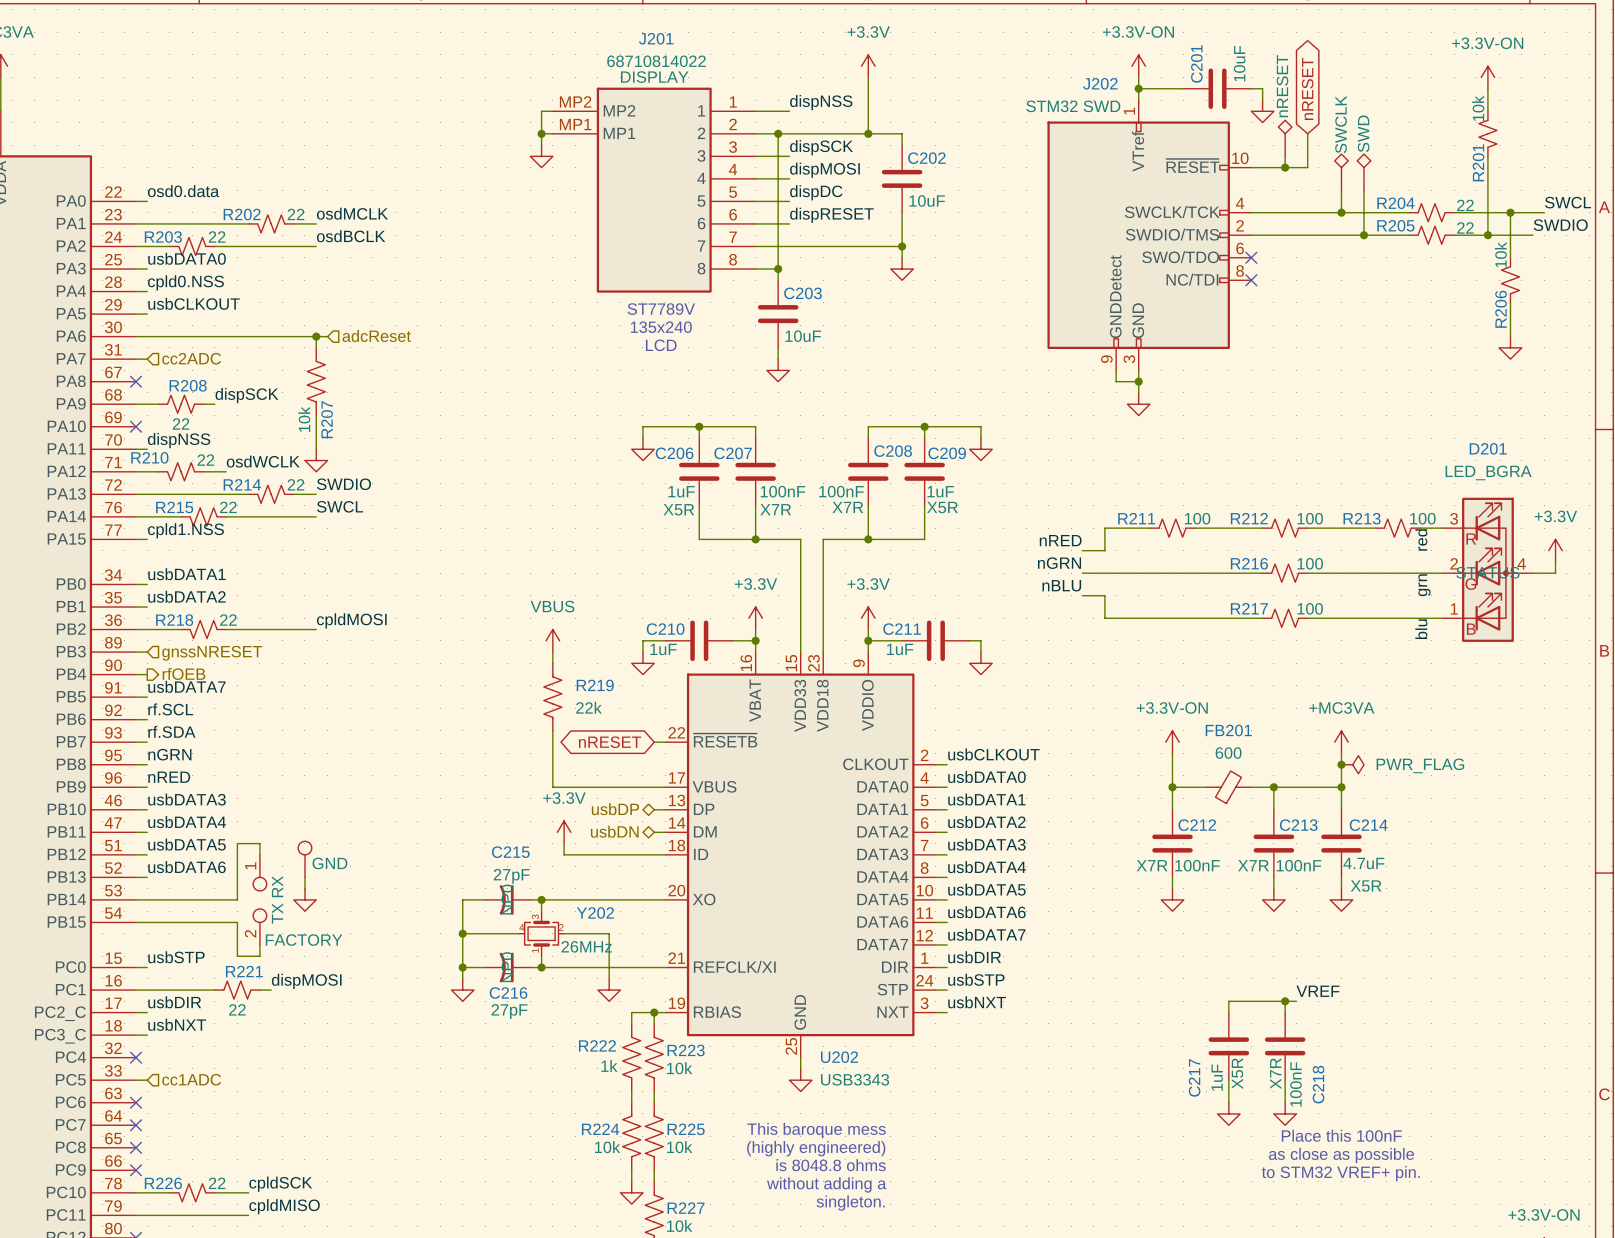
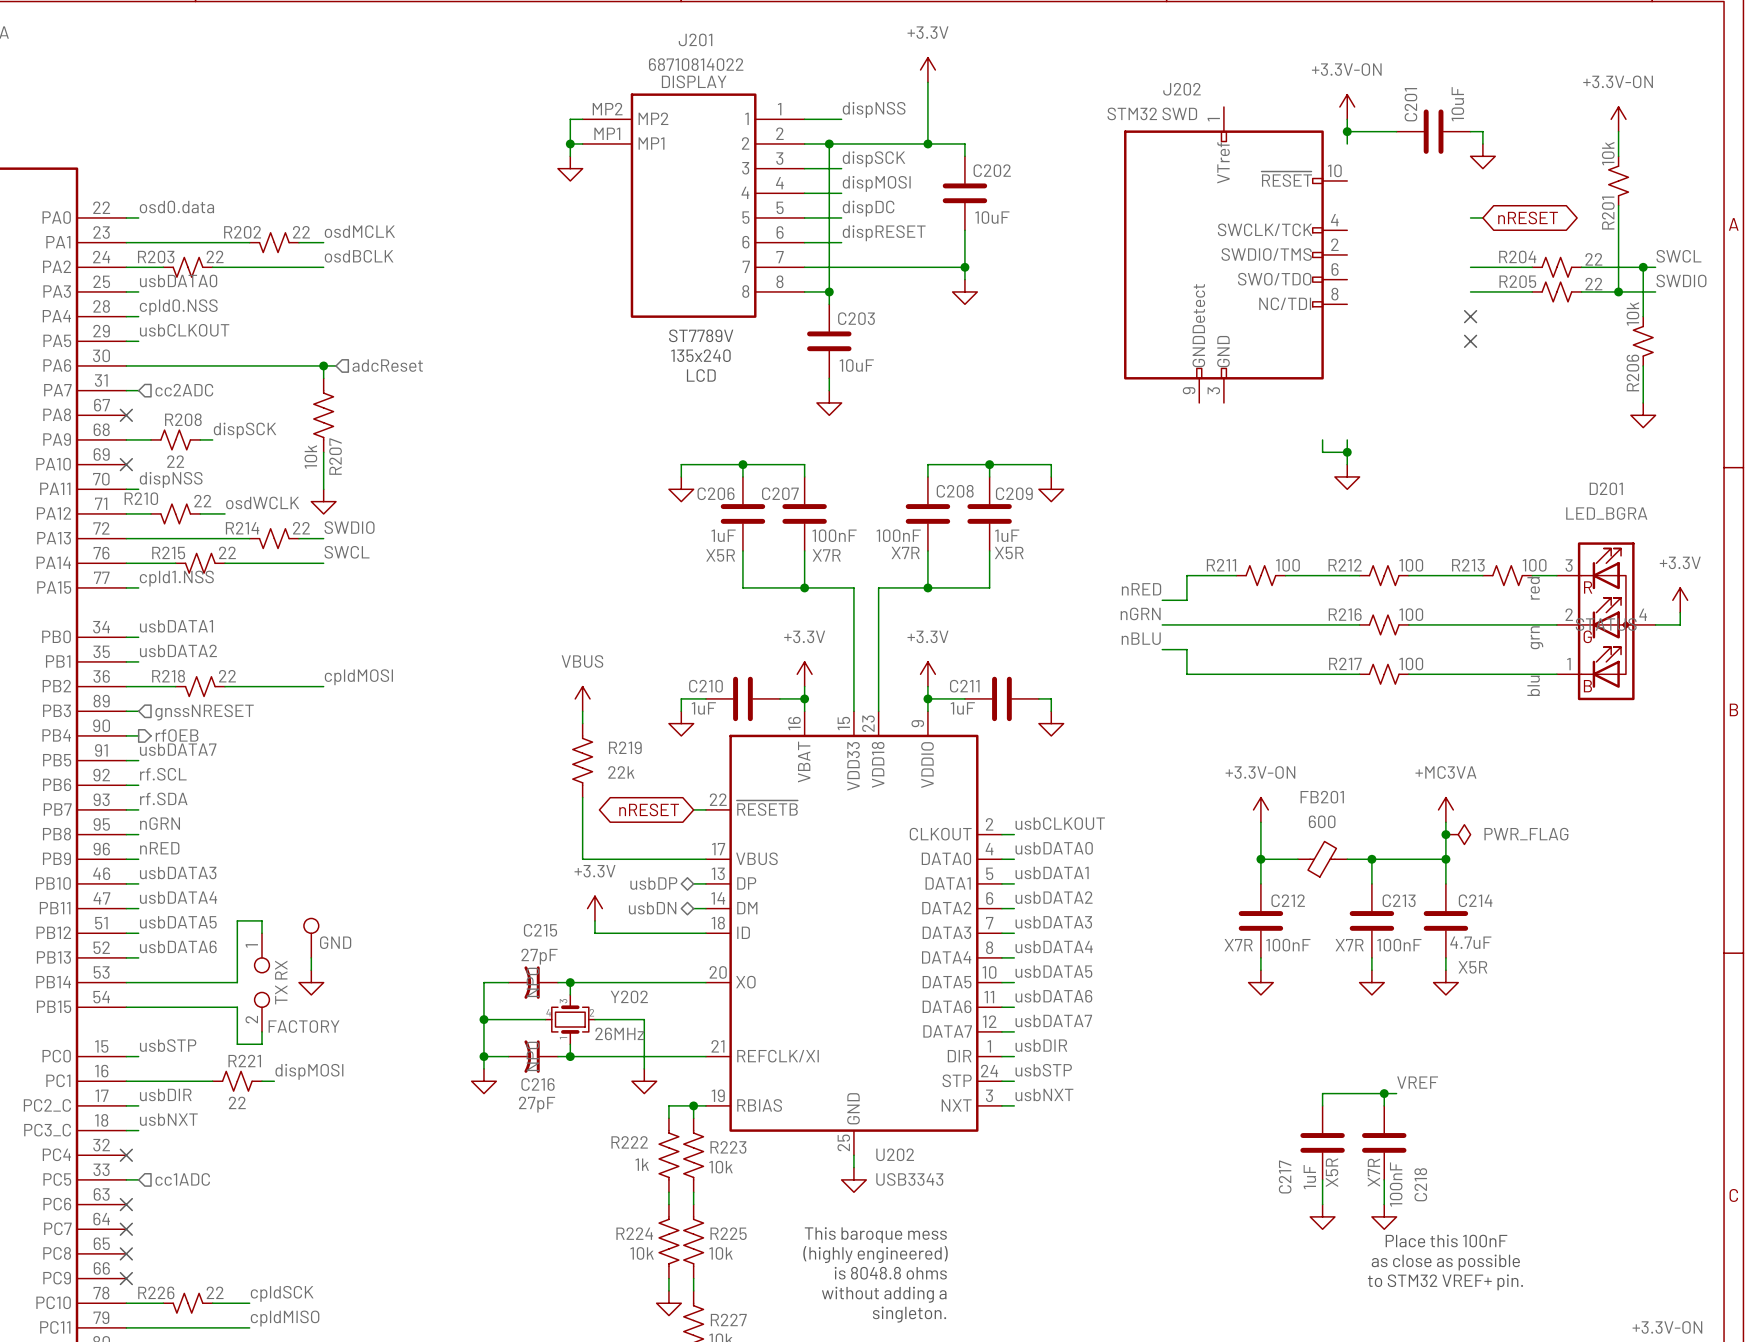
power symbol position: +3.3V-ON (1138, 66) -> +3.3V-ON (1347, 106)
wire: (1138, 77) (1138, 100) -> (1347, 119) (1347, 143)
power symbol position: +3.3V-ON (1487, 77) -> +3.3V-ON (1618, 119)
wire: (1138, 88) (1183, 88) -> (1347, 131) (1396, 131)
junction: (1138, 88) -> none
C201 position: (1217, 88) -> (1433, 131)
wire: (1251, 88) (1262, 88) (1262, 100) -> (1470, 131) (1482, 131) (1482, 143)
global label rotation: 0° (1307, 88) -> 90° clockwise (1528, 217)
global label position: nRESET (1307, 88) -> nRESET (1528, 217)
wire: (1487, 88) (1487, 111) -> (1618, 131) (1618, 156)
power symbol position: (1262, 111) -> (1482, 156)
junction: none -> (1347, 131)
wire: (1307, 133) (1307, 167) (1251, 167) -> none
R201 position: (1487, 133) -> (1618, 180)
part: (1285, 138) -> none
wire: (1285, 156) (1285, 167) -> none
wire: (1487, 156) (1487, 235) -> (1618, 205) (1618, 291)
junction: (1285, 167) -> none
part: (1341, 172) -> none
part: (1364, 172) -> none
wire: (1341, 190) (1341, 212) -> none
wire: (1364, 190) (1364, 235) -> none
wire: none -> (1470, 217) (1482, 217)
label position: SWCL (1568, 202) -> SWCL (1678, 256)
wire: (1251, 212) (1409, 212) -> none
junction: (1341, 212) -> none
R204 position: (1431, 212) -> (1556, 267)
wire: (1454, 212) (1544, 212) -> none
wire: (1510, 212) (1510, 257) -> (1643, 267) (1643, 316)
junction: (1510, 212) -> none
label position: SWDIO (1560, 225) -> SWDIO (1681, 280)
wire: (1251, 235) (1409, 235) -> none
junction: (1364, 235) -> none
R205 position: (1431, 235) -> (1556, 291)
wire: (1454, 235) (1533, 235) -> none
junction: (1487, 235) -> none
wire: none -> (1470, 267) (1532, 267)
wire: none -> (1581, 267) (1655, 267)
junction: none -> (1643, 267)
no-connect mark: (1251, 257) -> none
wire: none -> (1470, 291) (1532, 291)
wire: none -> (1581, 291) (1655, 291)
junction: none -> (1618, 291)
no-connect mark: (1251, 280) -> none
R206 position: (1510, 280) -> (1643, 341)
no-connect mark: none -> (1470, 316)
wire: (1510, 302) (1510, 336) -> (1643, 365) (1643, 402)
no-connect mark: none -> (1470, 341)
power symbol position: (1510, 347) -> (1643, 415)
wire: (1116, 370) (1116, 381) (1138, 381) -> (1322, 439) (1322, 452) (1347, 452)
wire: (1138, 370) (1138, 392) -> (1347, 439) (1347, 464)
junction: (1138, 381) -> none
power symbol position: (1138, 404) -> (1347, 476)
junction: none -> (1347, 452)

